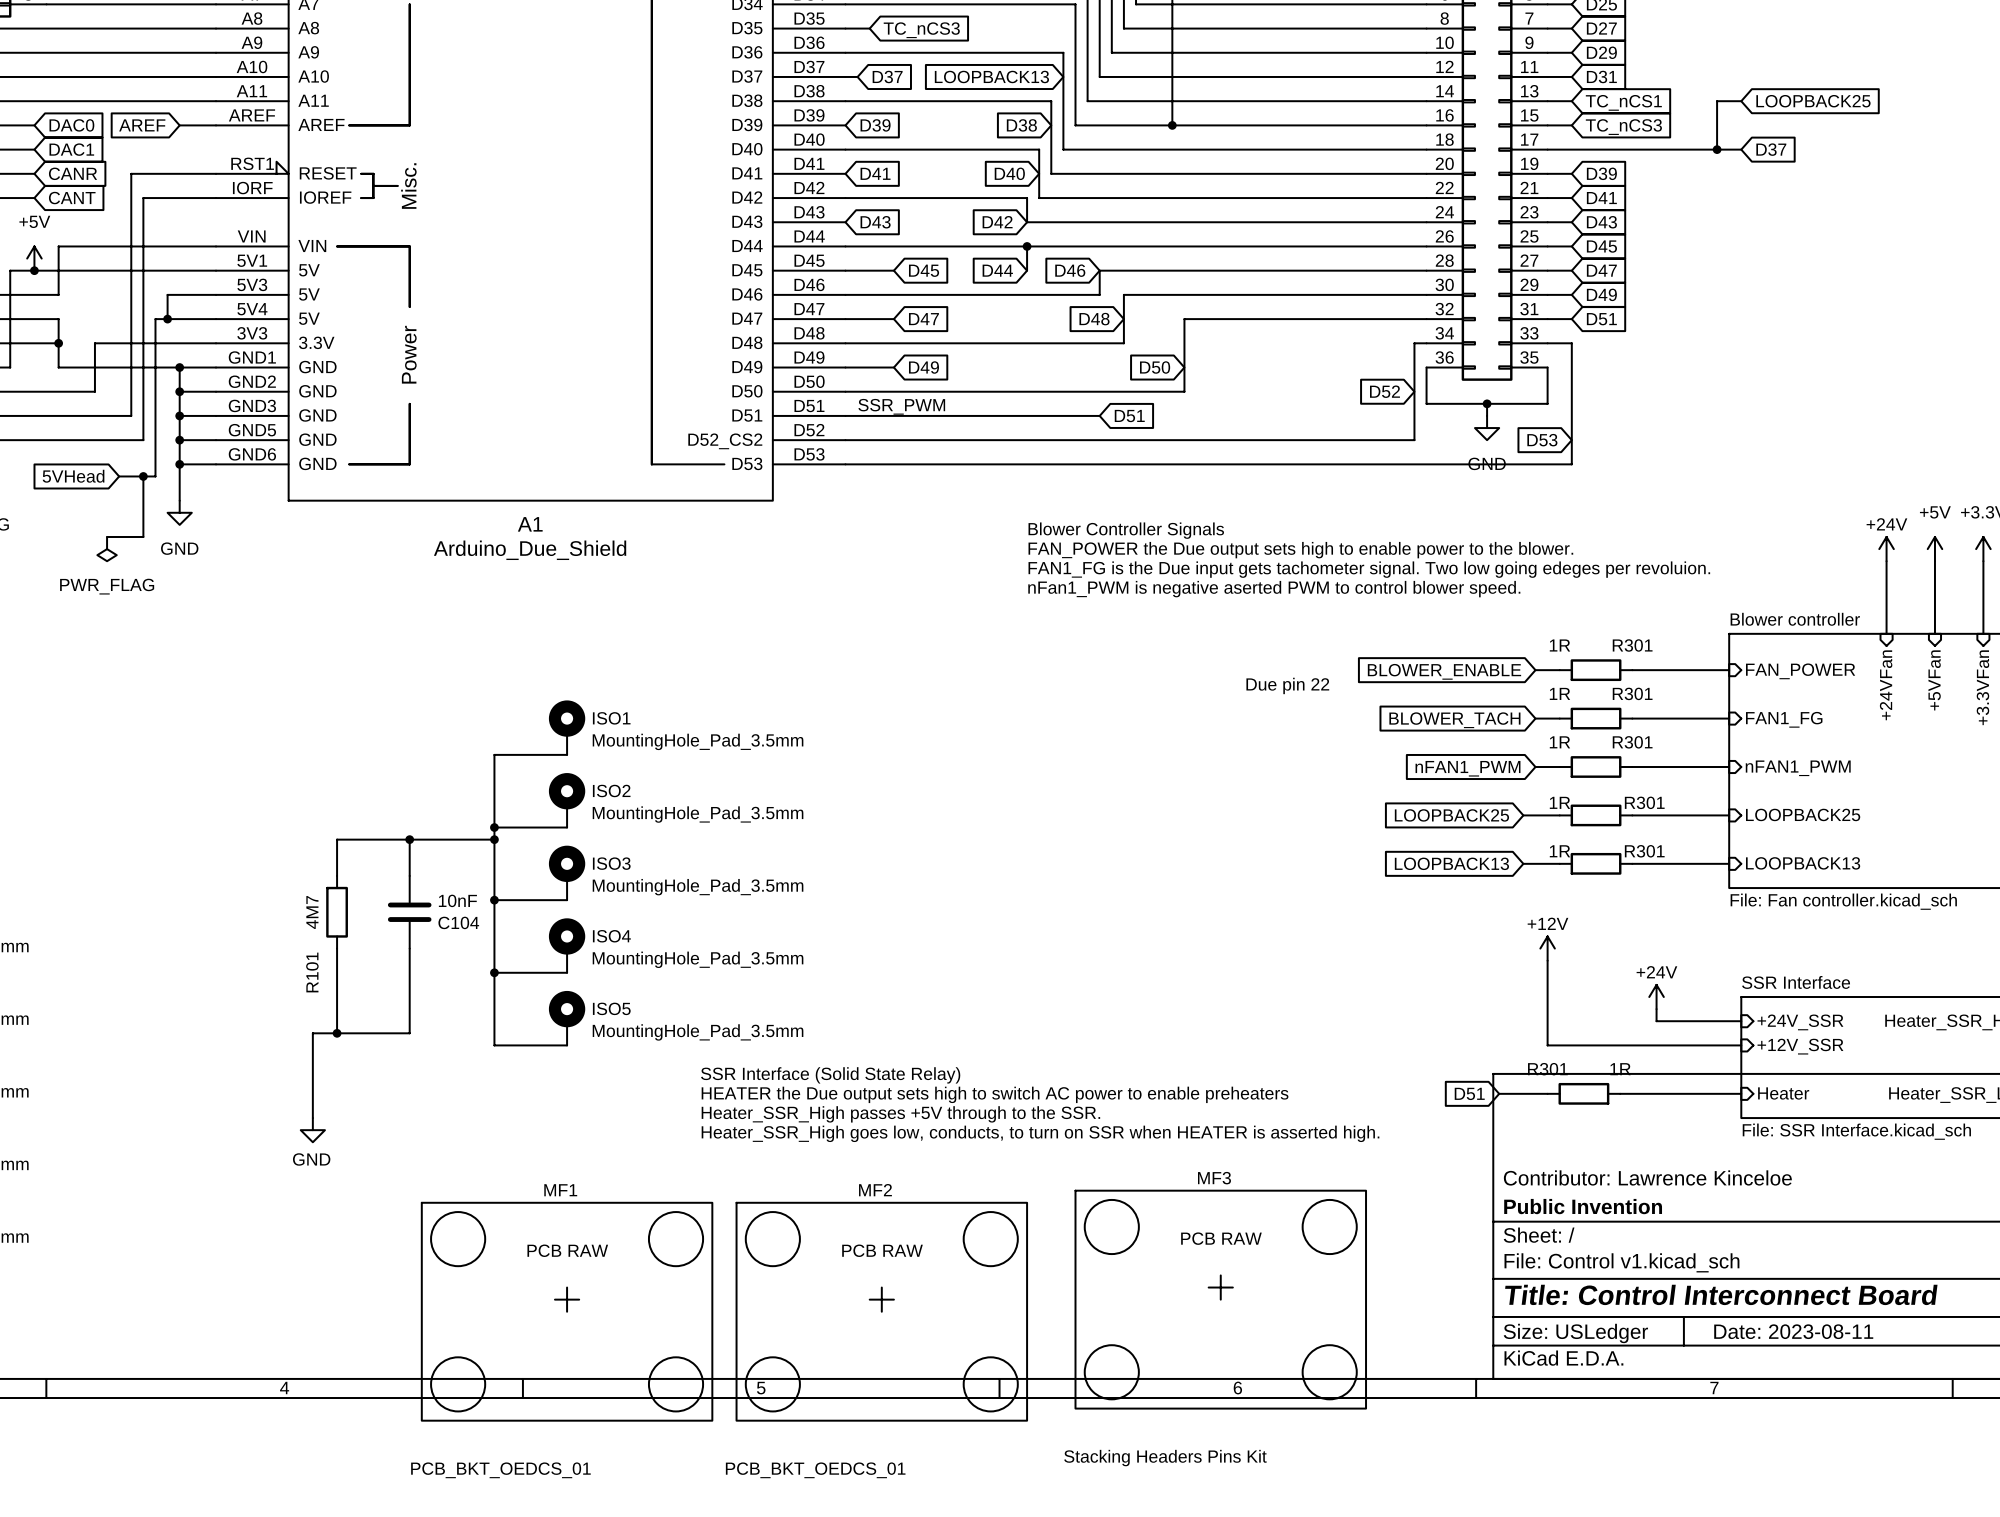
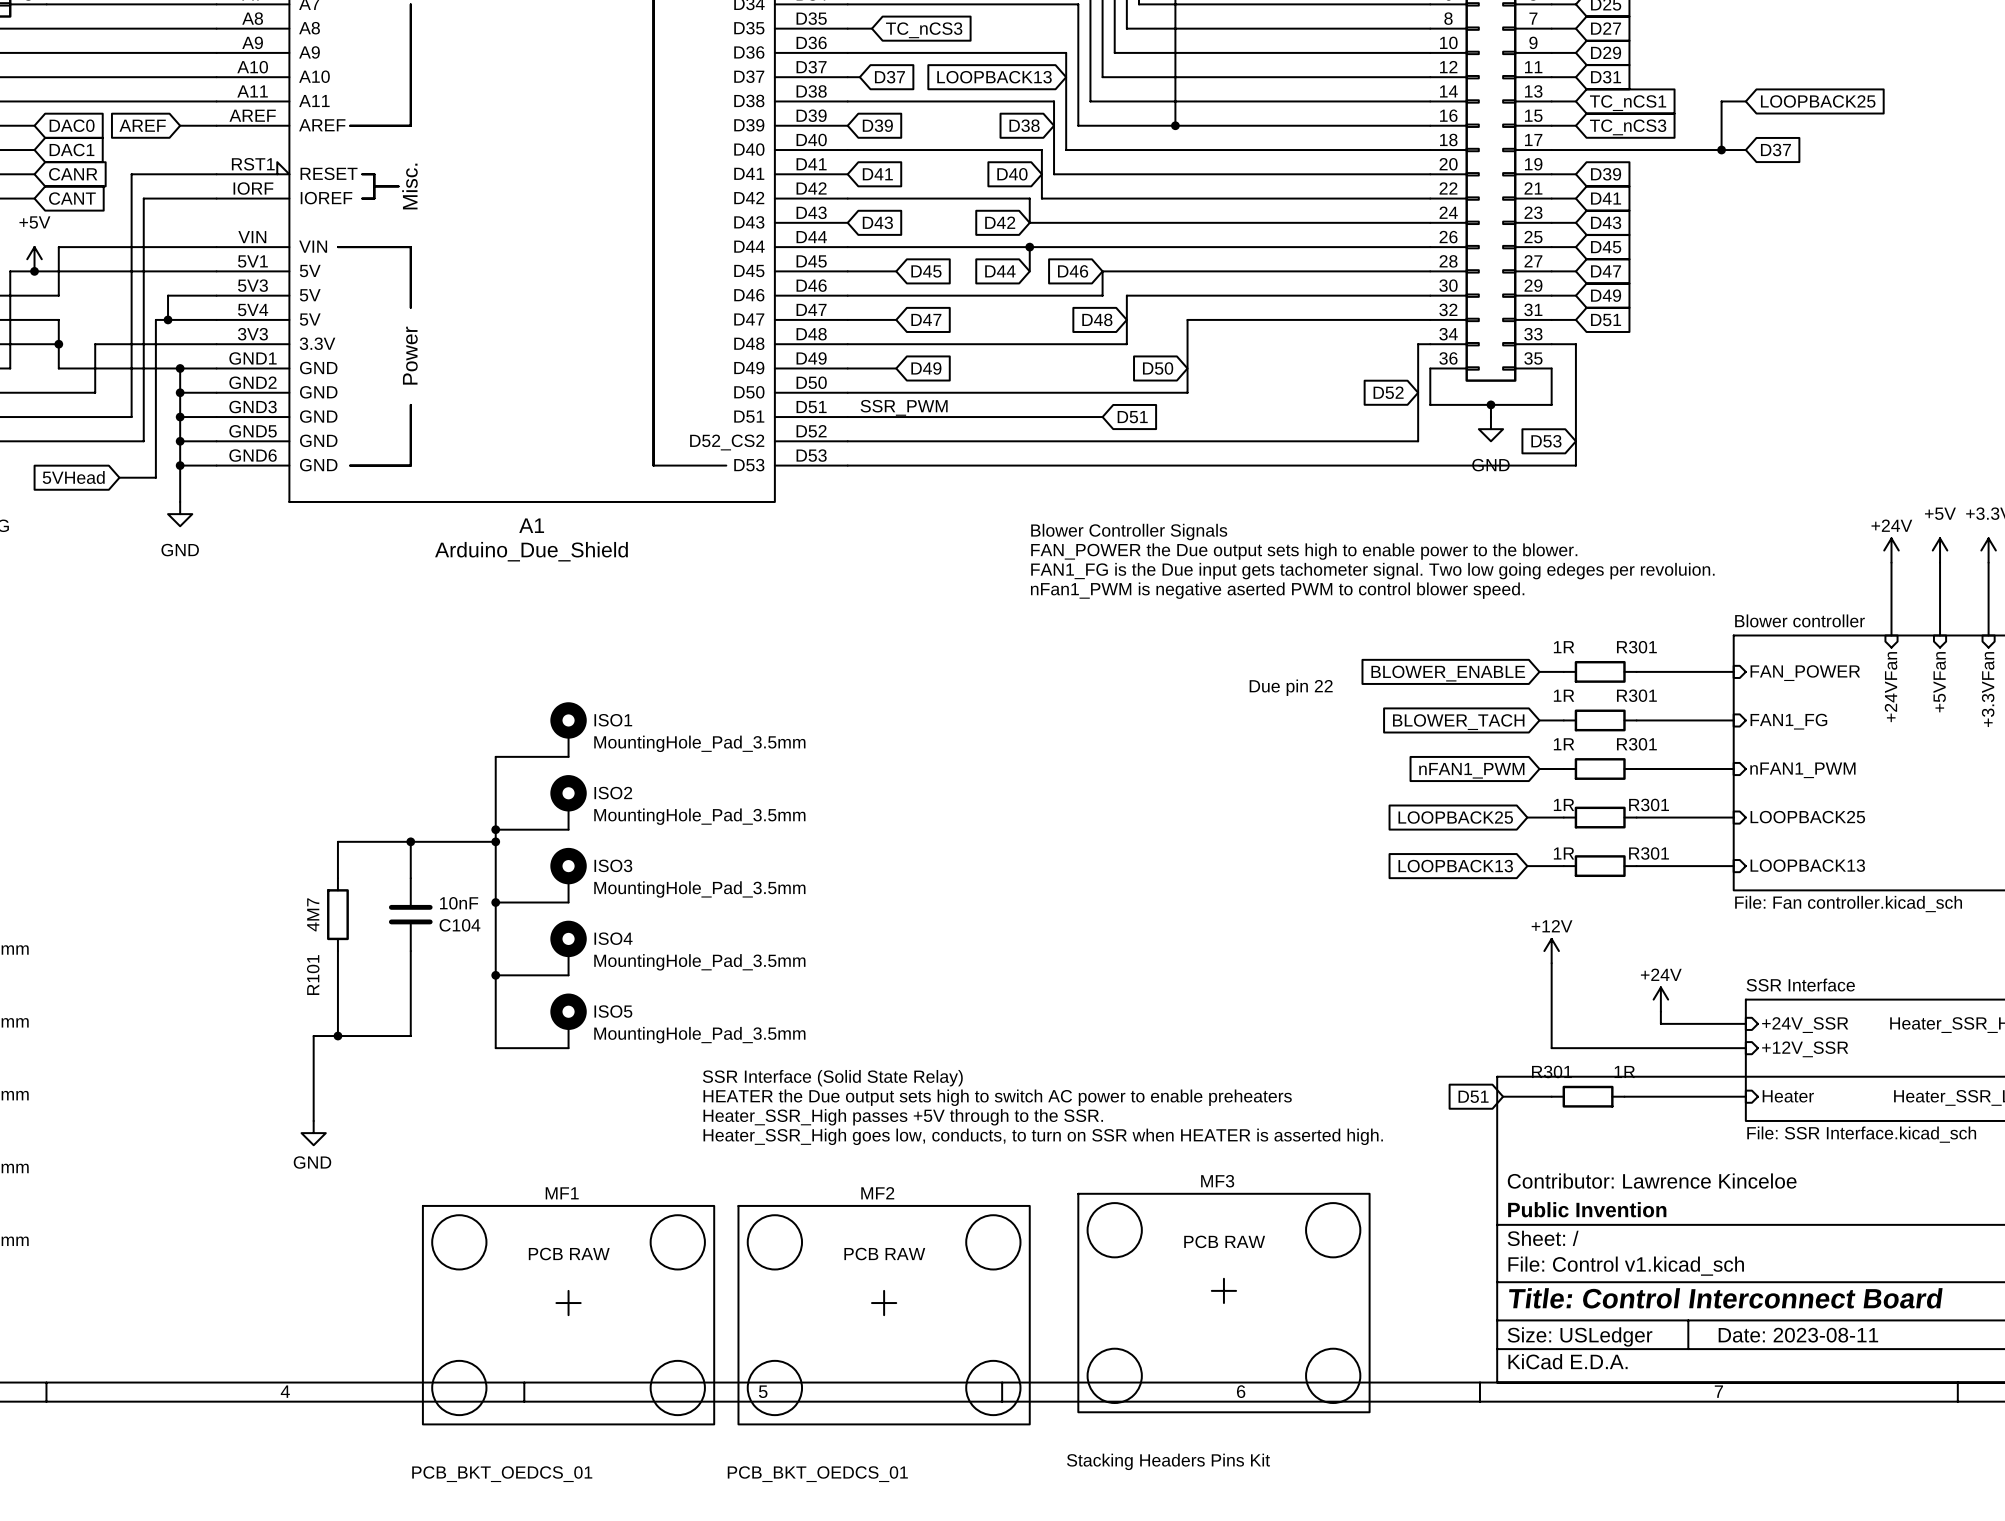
wire: (143, 476) (143, 536) (107, 536) -> none
junction: (143, 476) -> none
power symbol: PWR_FLAG (107, 549) -> none

